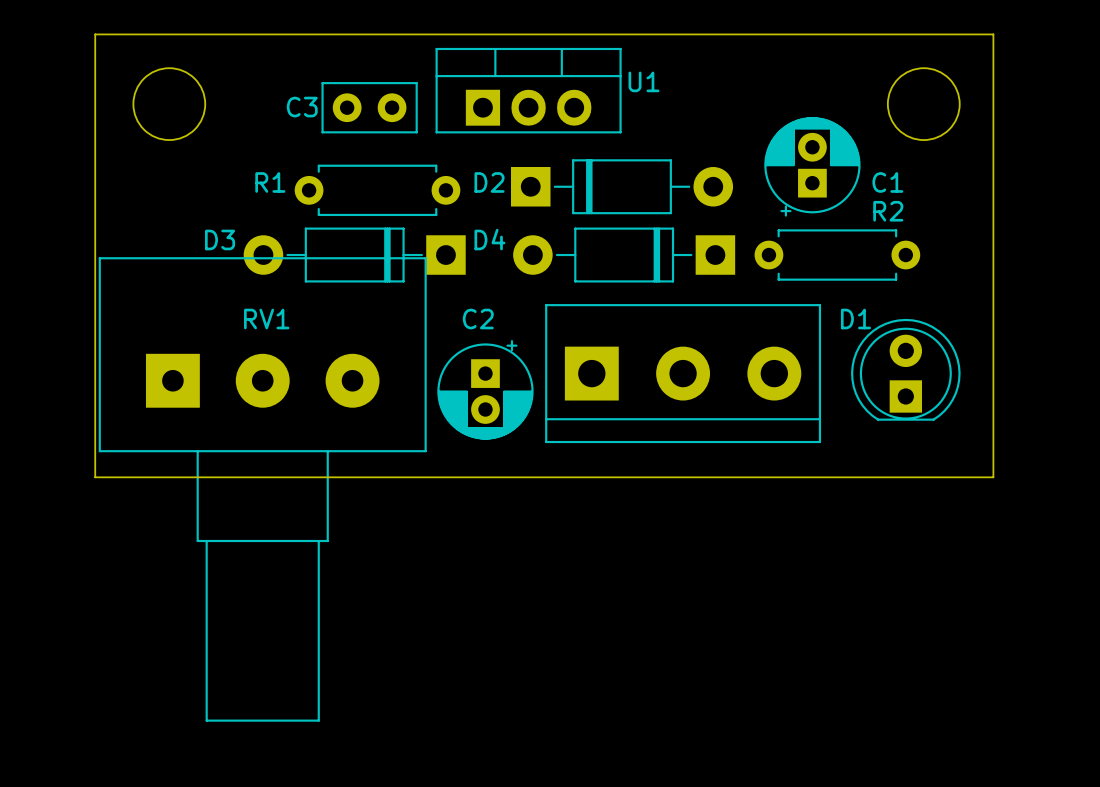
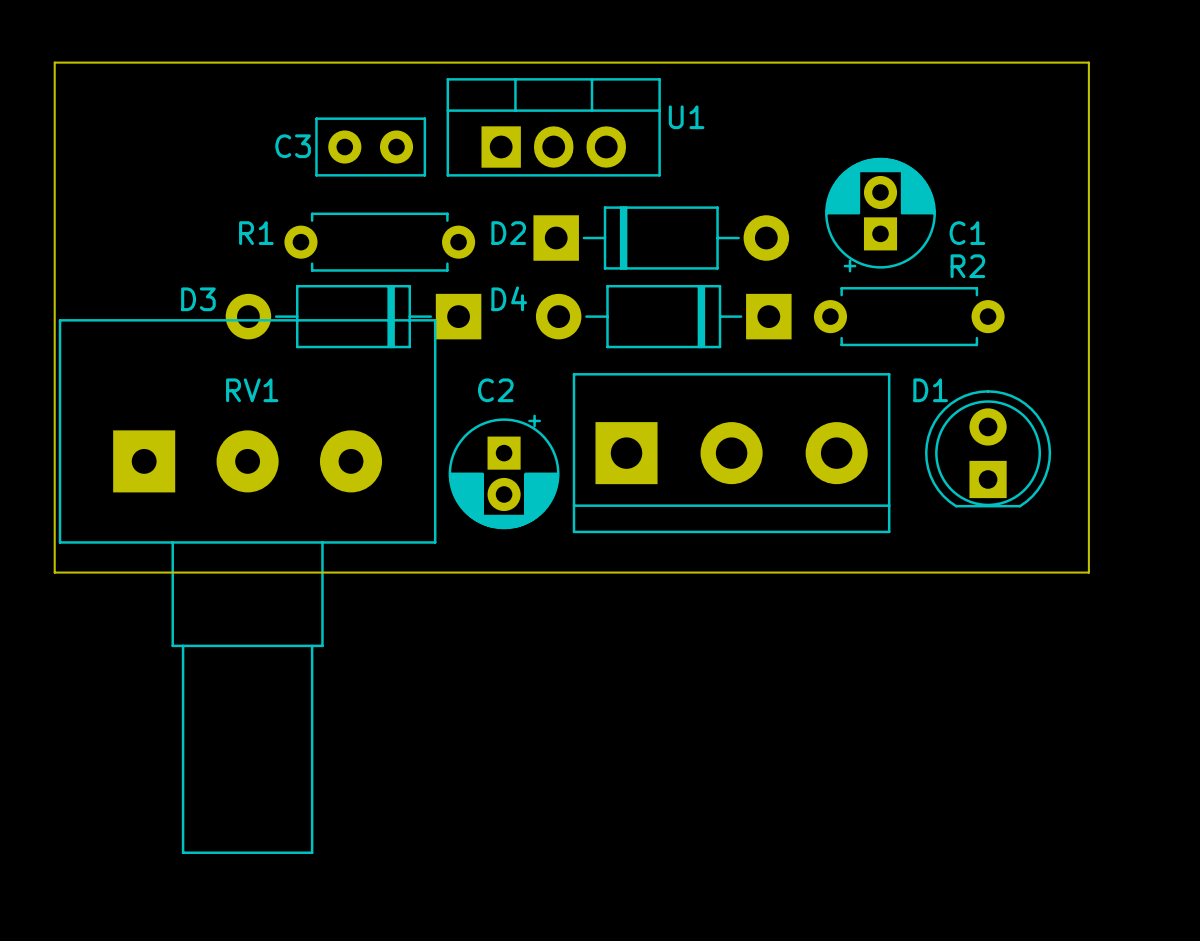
round board edge: [132, 67, 207, 141] -> none
round board edge: [886, 67, 961, 141] -> none

